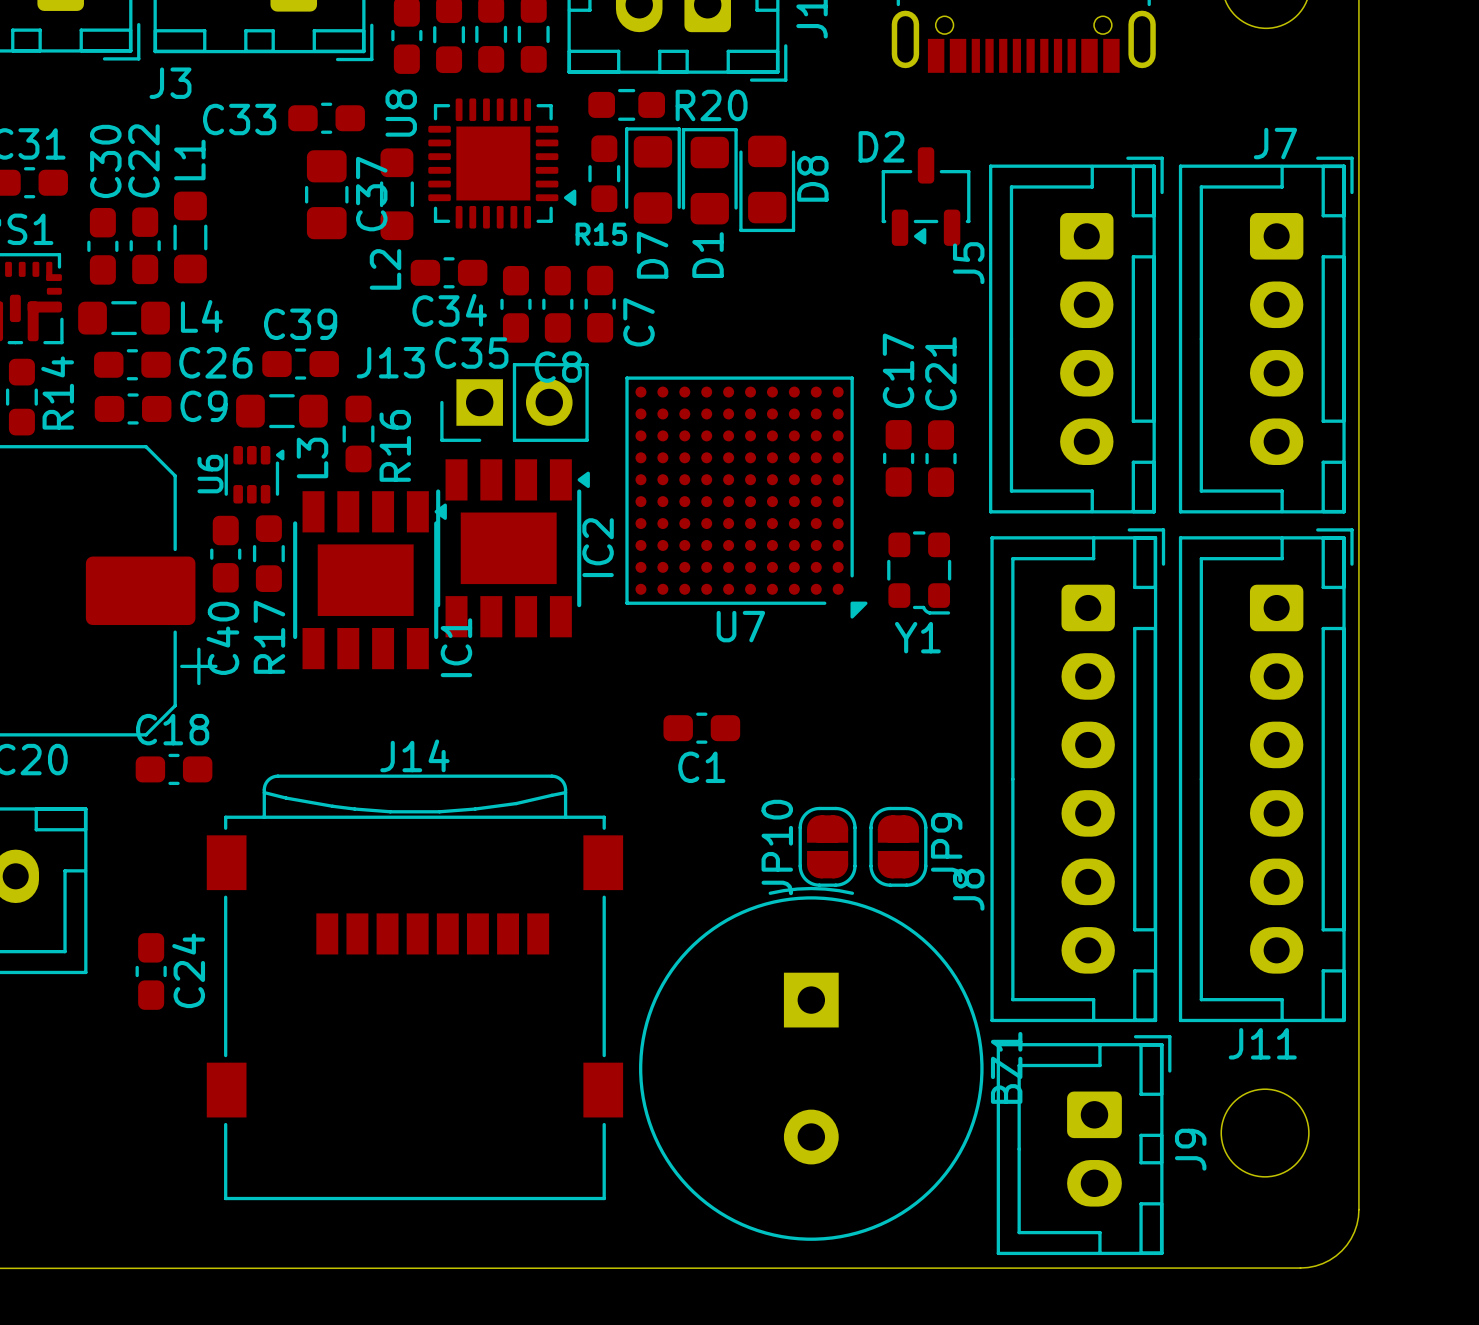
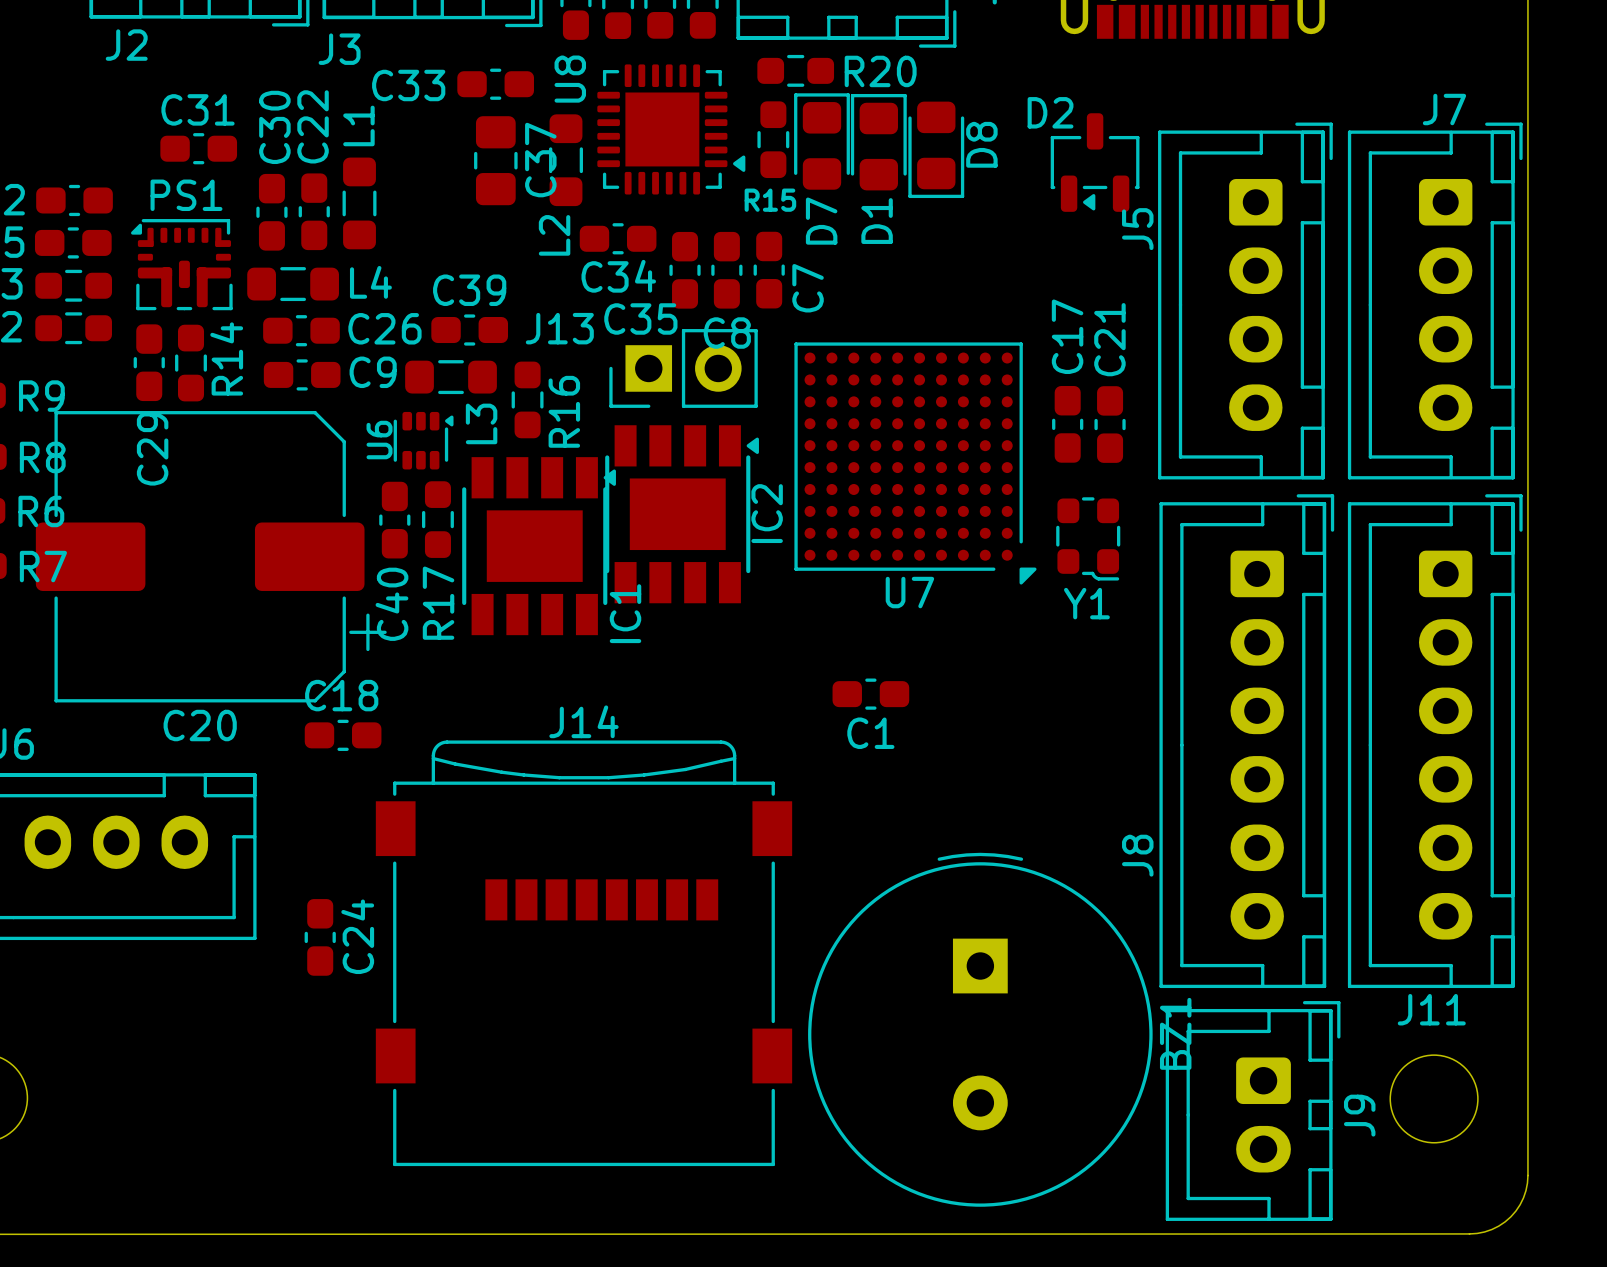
JP10: (827, 846) -> none
JP9: (898, 846) -> none

